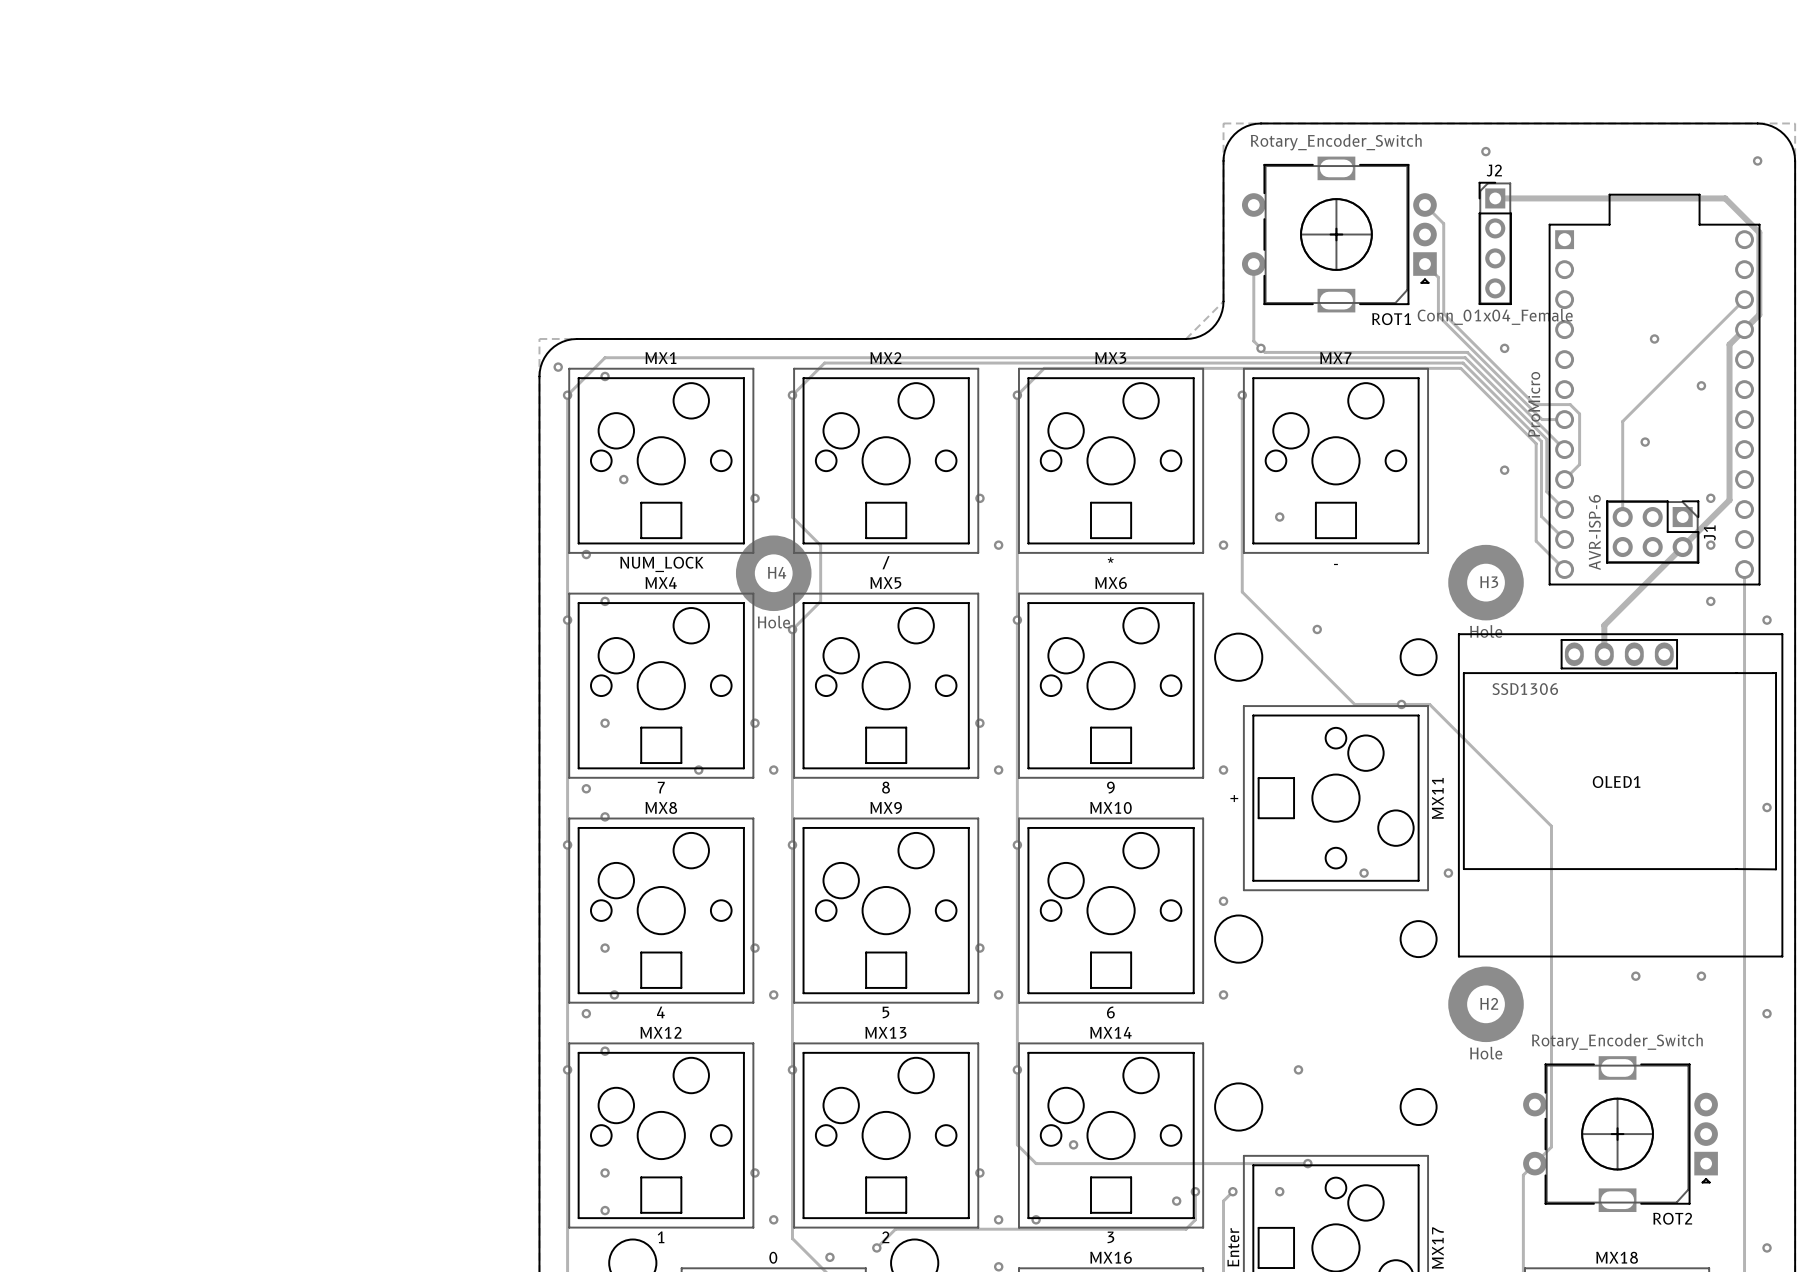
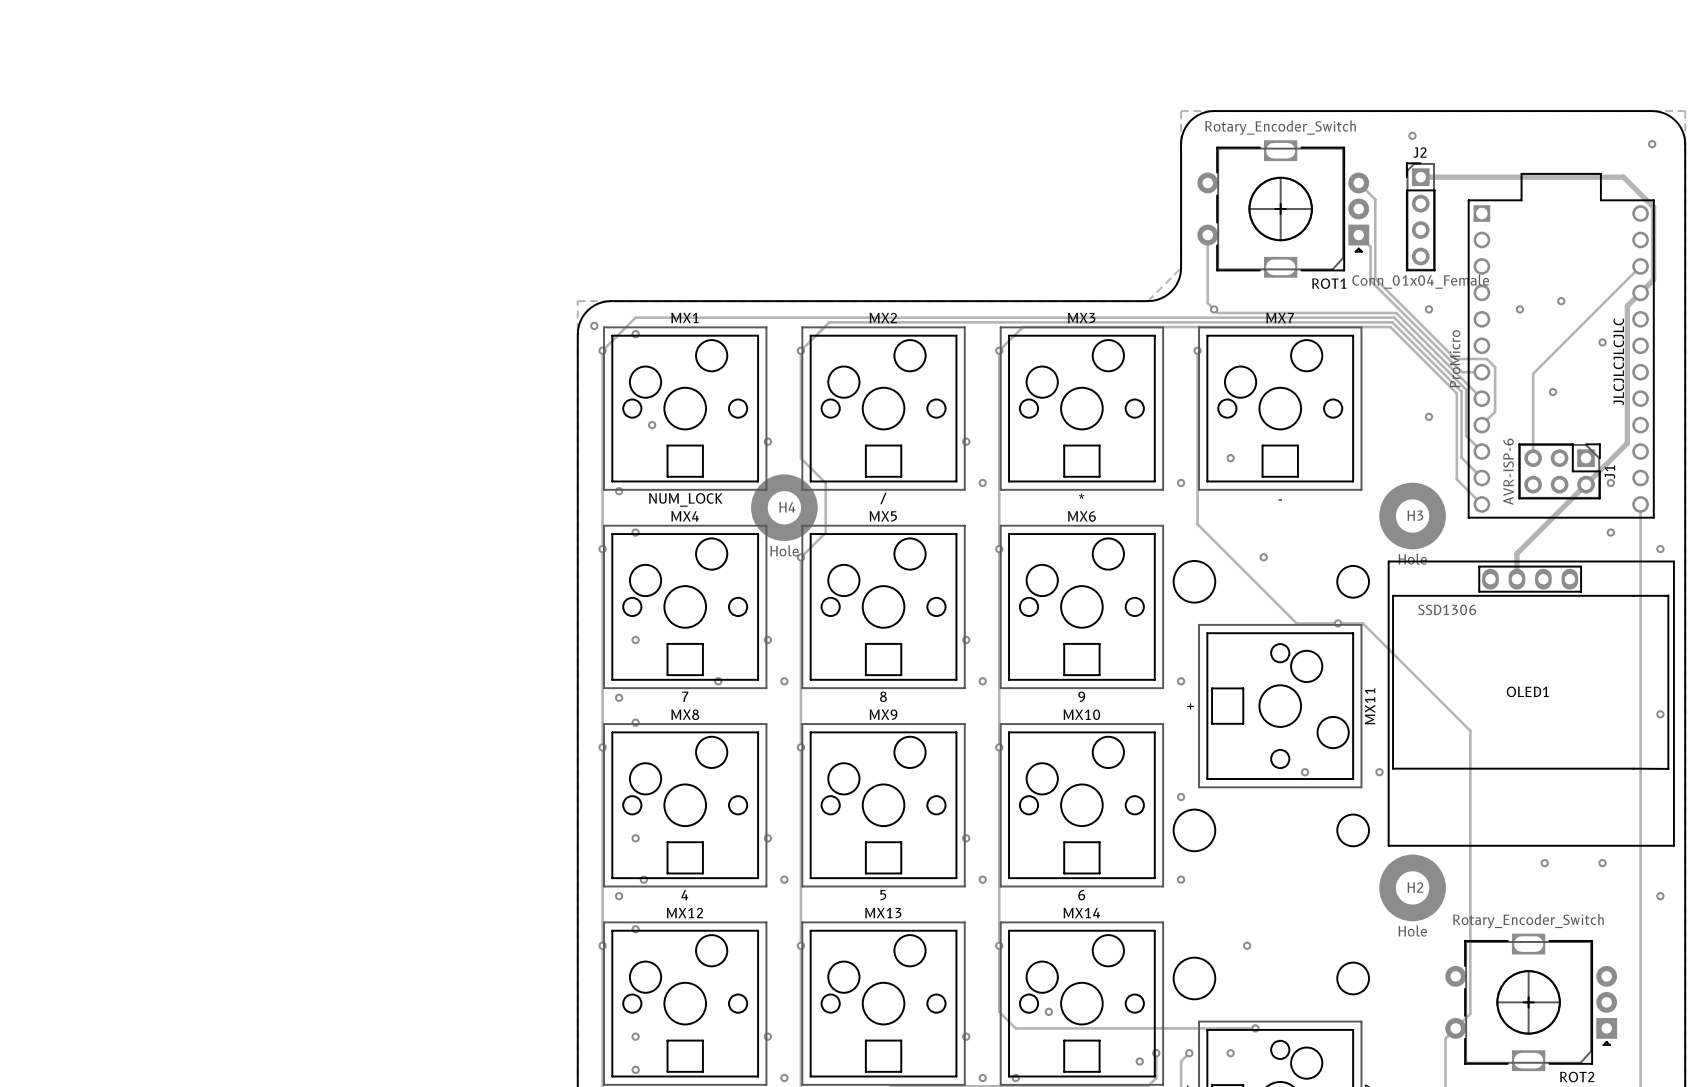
via: none -> (1519, 309)
text: none -> JLCJLCJLCJLC (1618, 361)
via: (1710, 498) -> none

